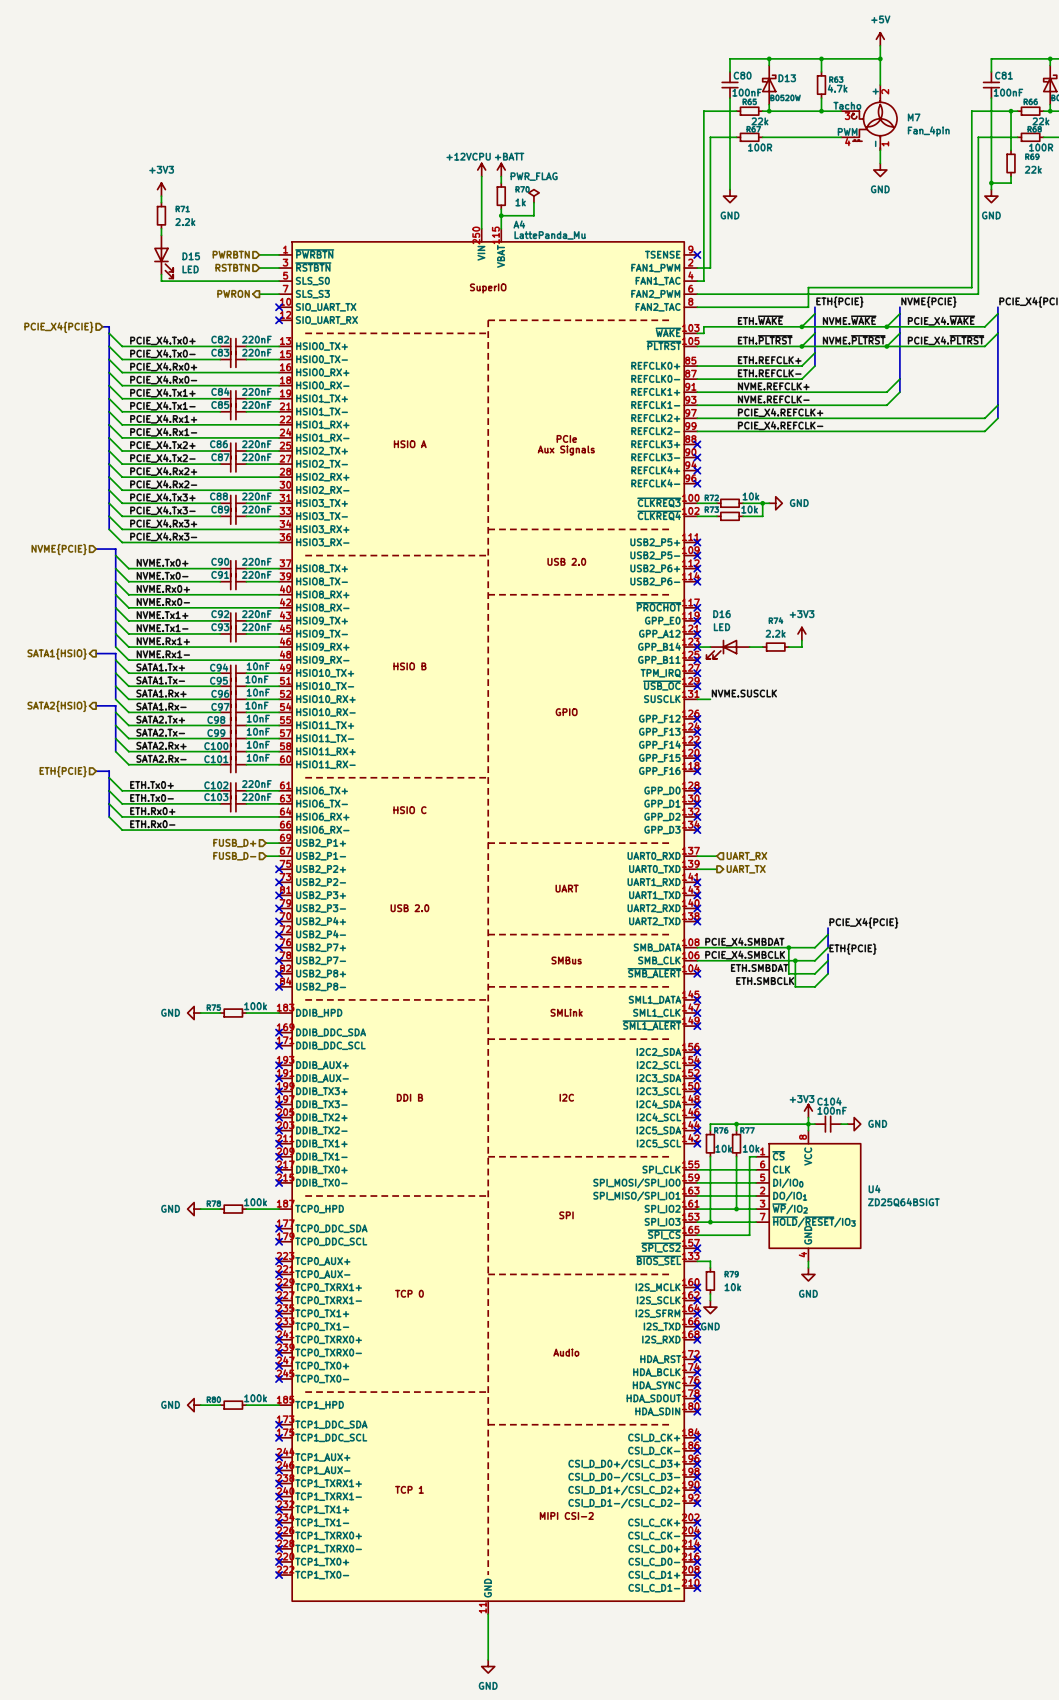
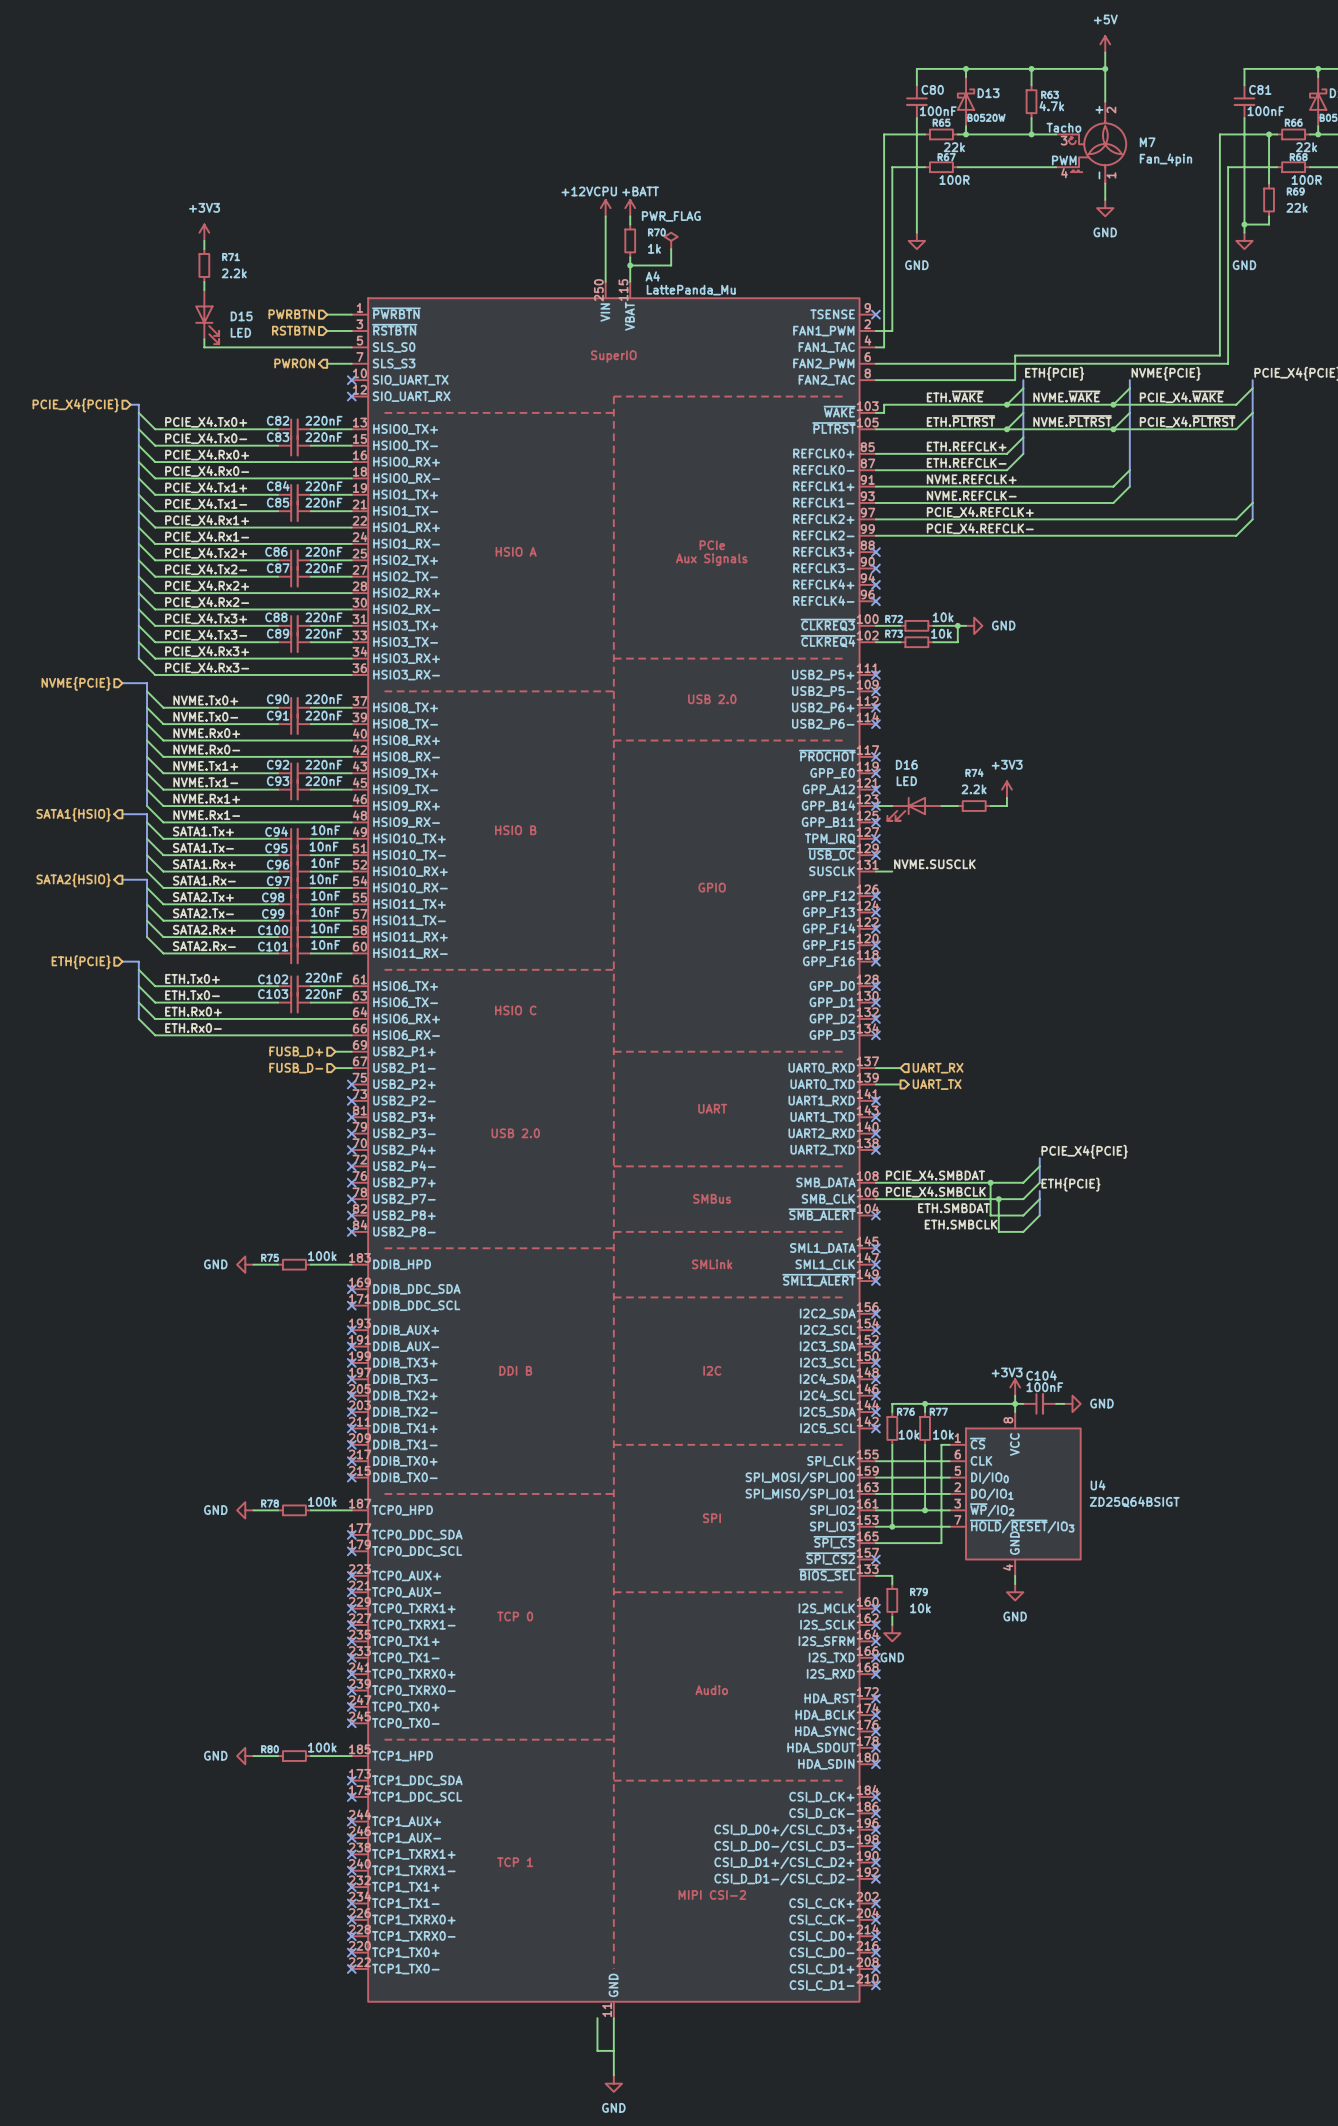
wire: none -> (597, 2018) (597, 2050) (613, 2050)

